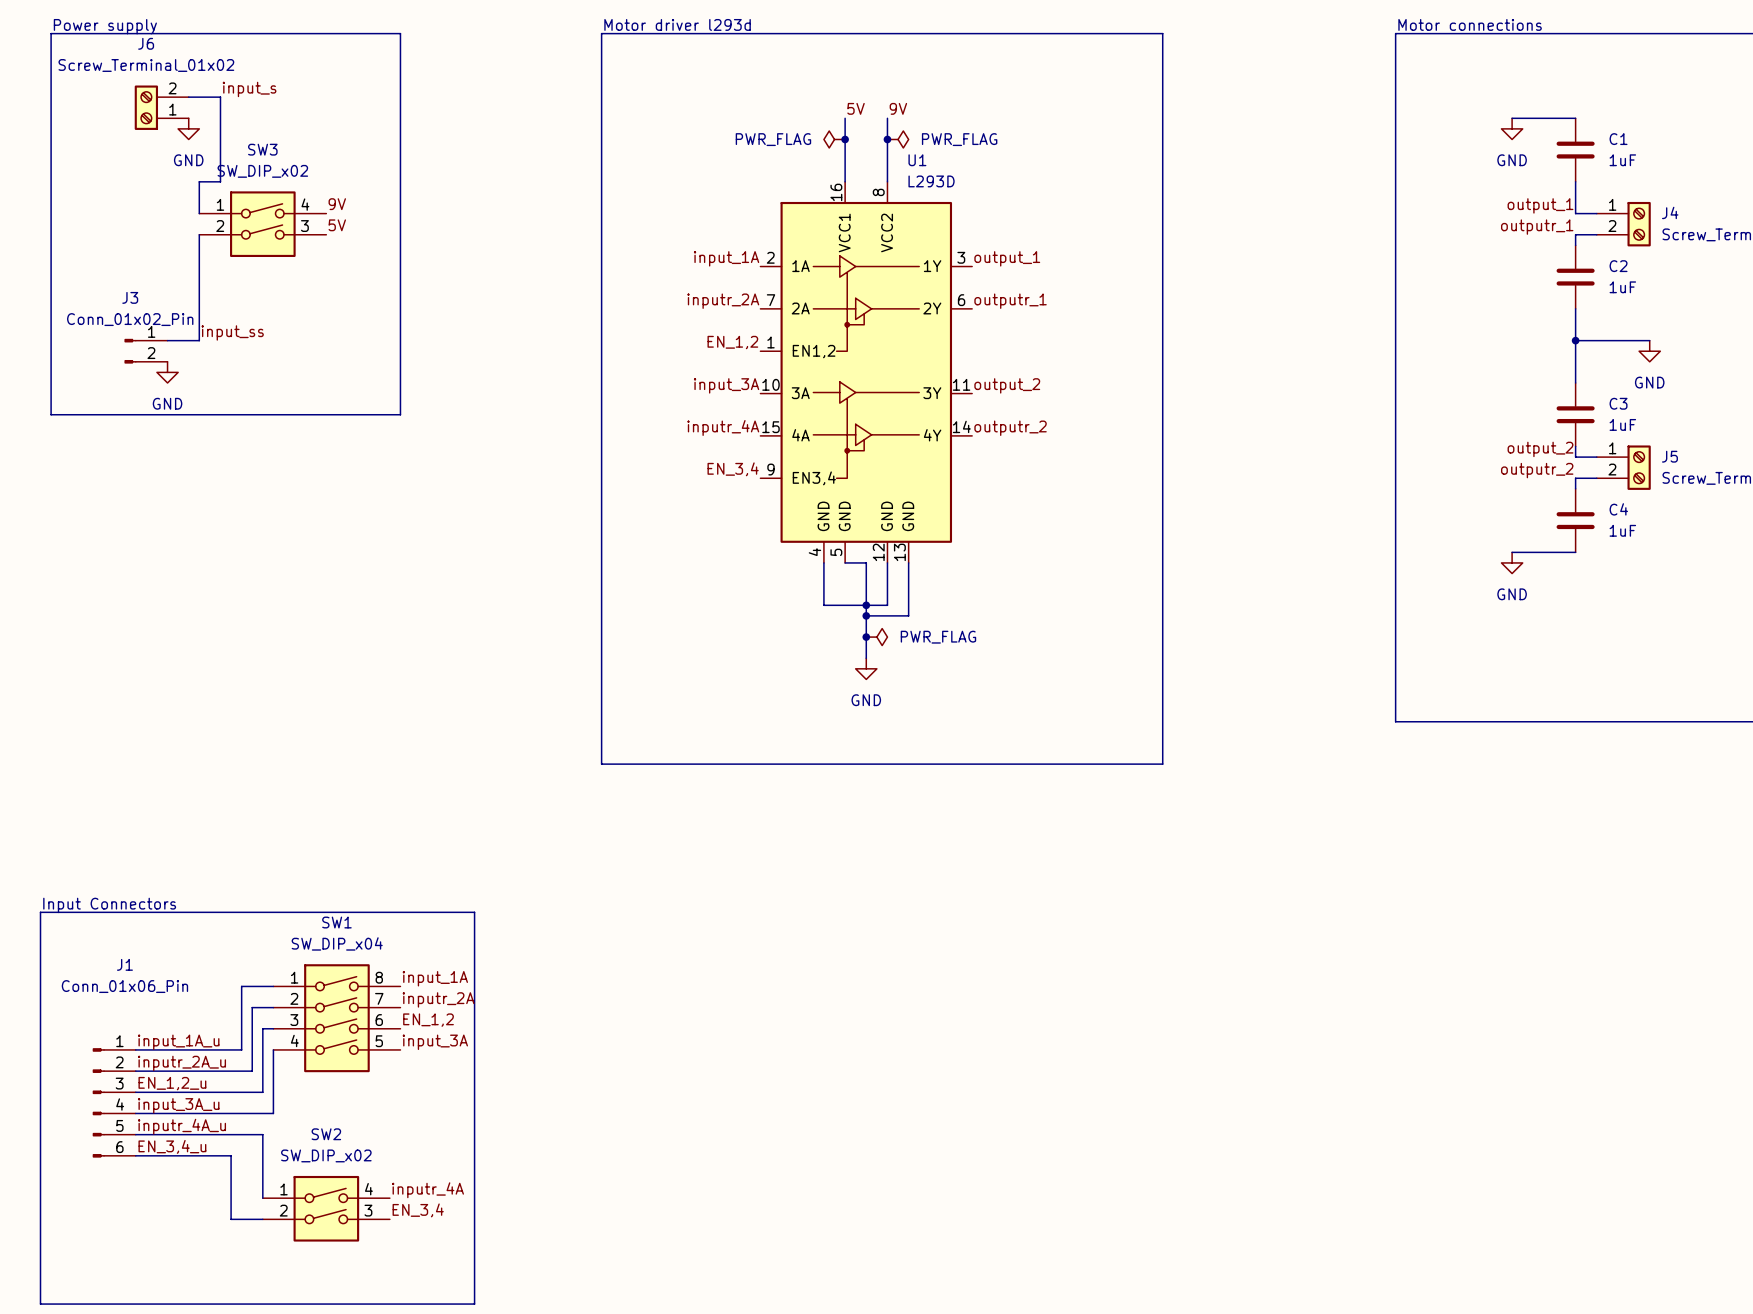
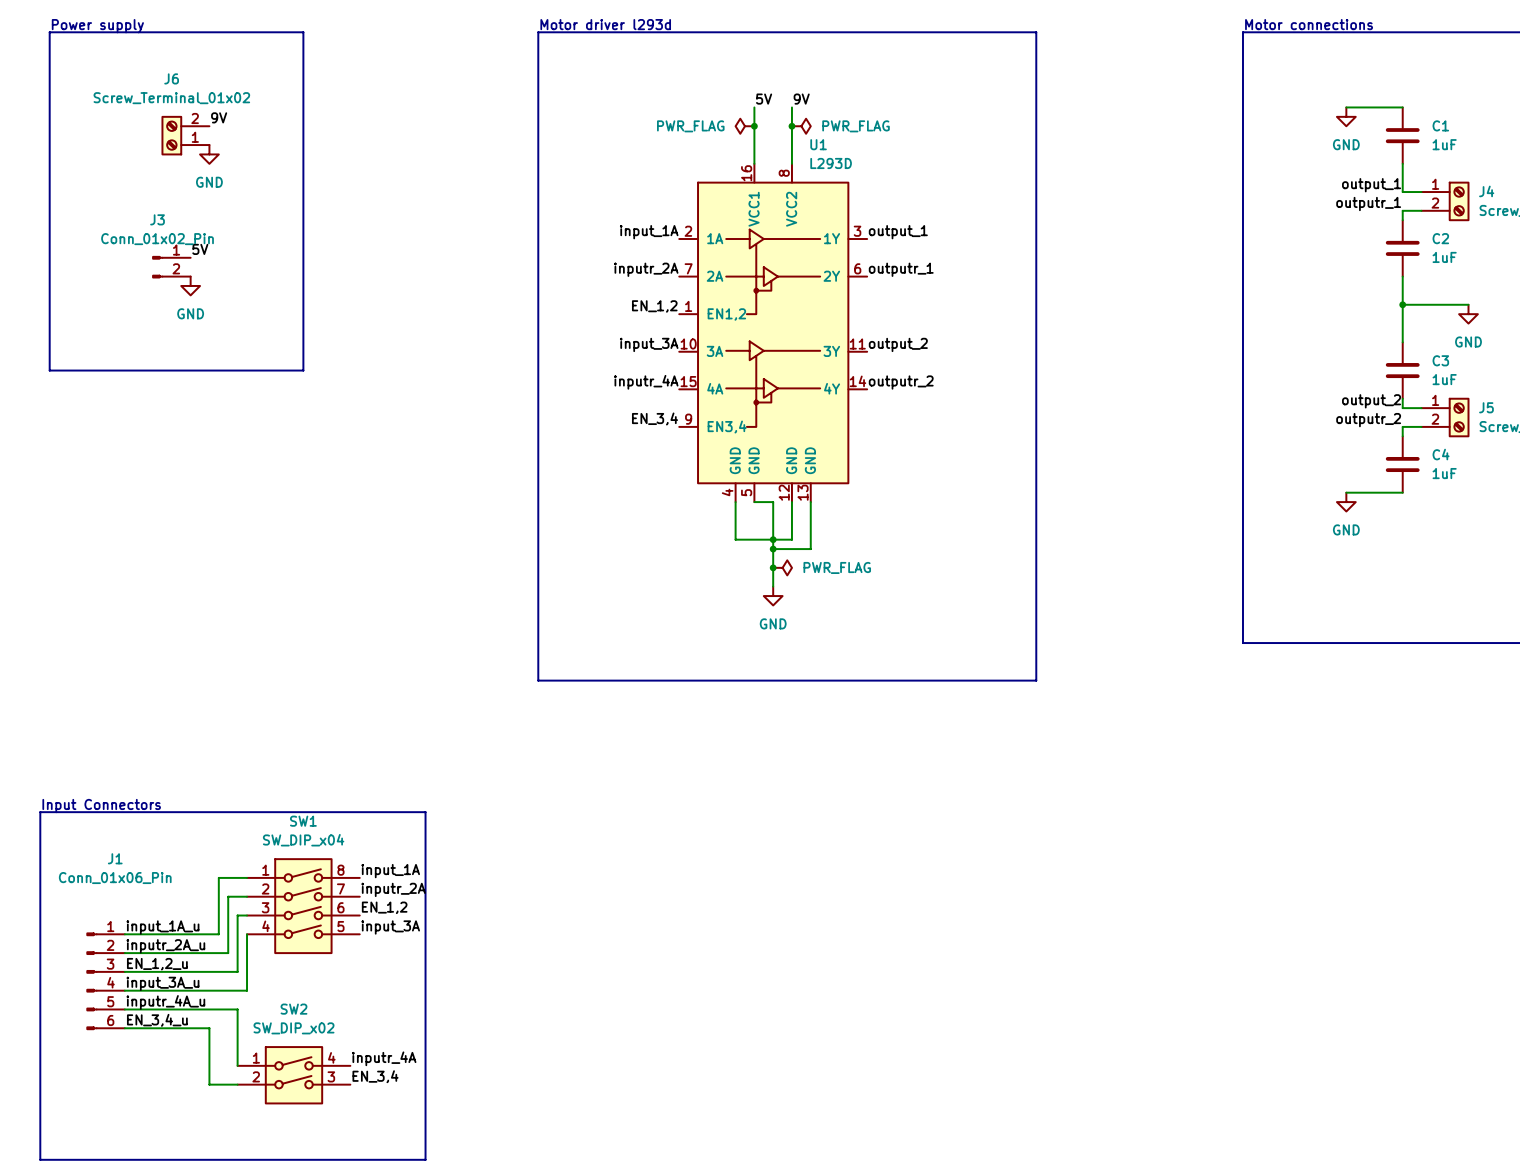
line: (336, 33) (400, 33) (400, 414) (336, 414) -> (303, 32) (303, 370)
label: input_s (249, 89) -> none
wire: (188, 97) (220, 97) (220, 181) (199, 181) (199, 213) -> none
J6 position: (161, 107) -> (185, 135)
power symbol position: GND (188, 128) -> GND (209, 154)
label position: 9V (337, 204) -> 9V (219, 117)
SW3: SW_DIP_x02 (262, 224) -> none
label position: 5V (337, 225) -> 5V (200, 249)
wire: (199, 234) (199, 340) (167, 340) -> none
label: input_ss (232, 332) -> none
J3 position: (146, 351) -> (171, 267)
power symbol position: GND (167, 372) -> GND (190, 285)

